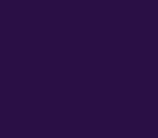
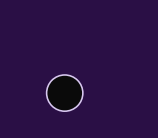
part: none -> (64, 93)

